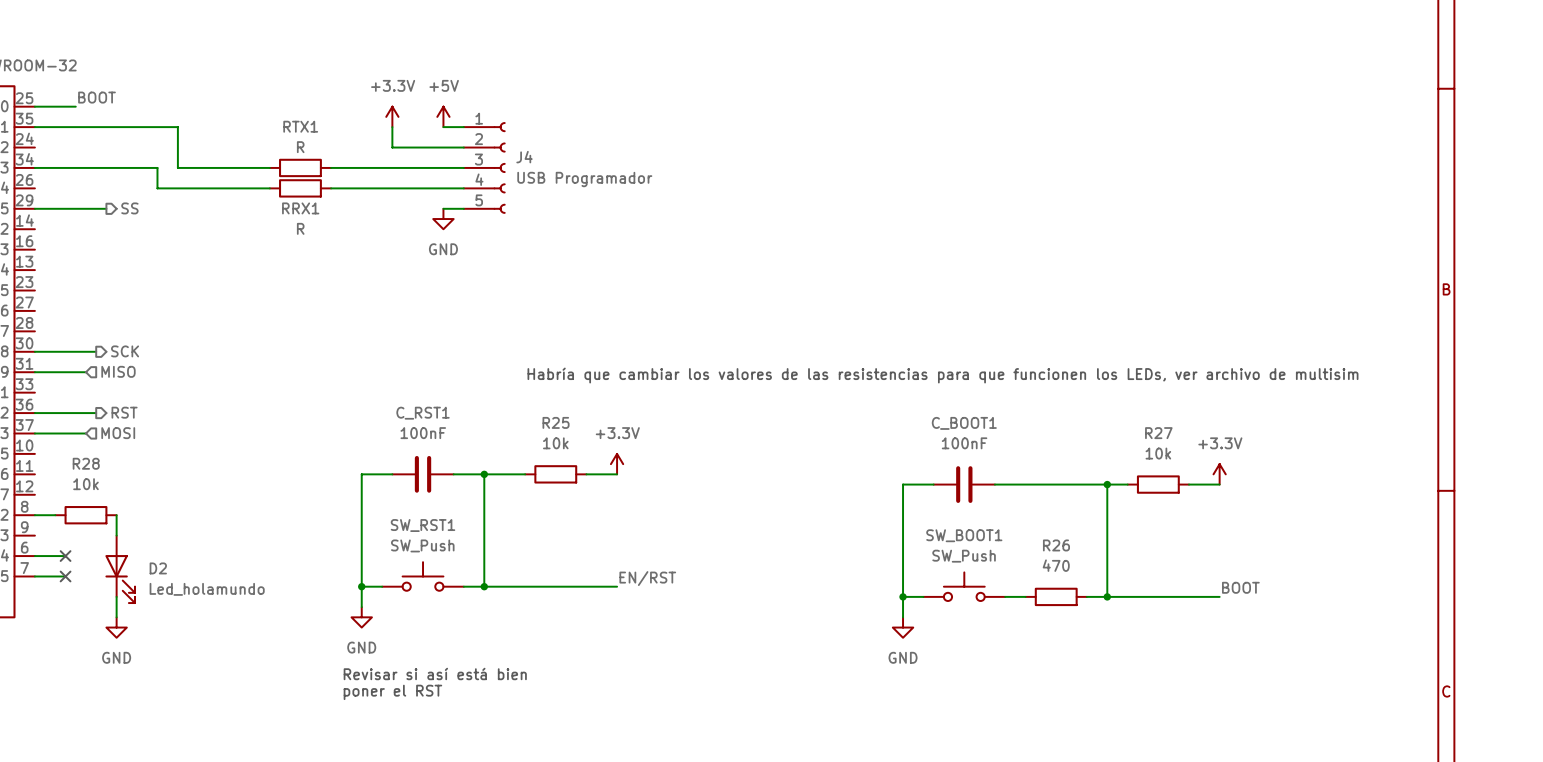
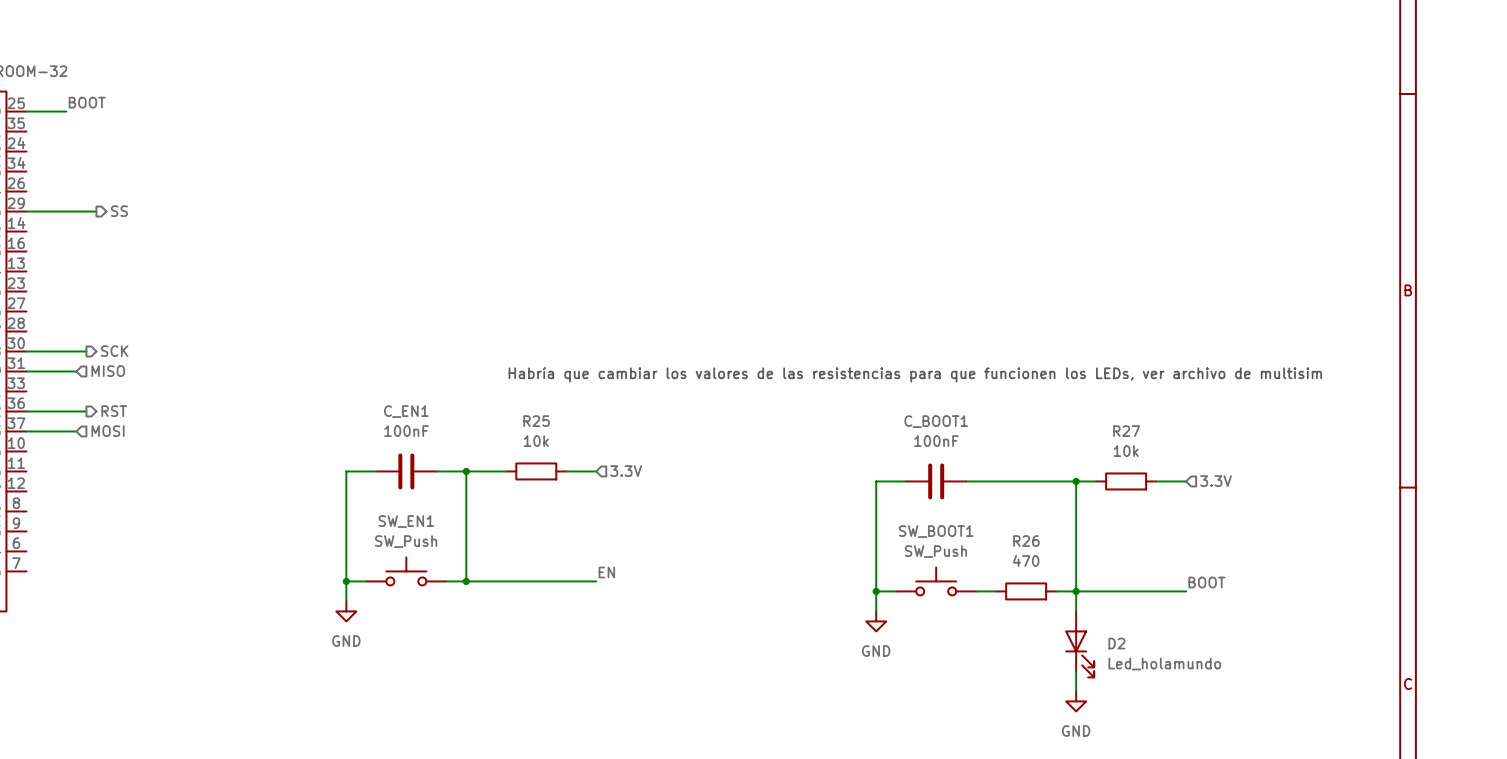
power symbol: +3.3V (392, 116) -> none
power symbol: +5V (443, 116) -> none
wire: (34, 127) (177, 127) (177, 167) (269, 167) -> none
wire: (392, 127) (392, 147) (463, 147) -> none
wire: (443, 127) (463, 127) -> none
wire: (34, 167) (157, 167) (157, 188) (269, 188) -> none
RTX1: R (300, 167) -> none
wire: (331, 167) (463, 167) -> none
J4: USB Programador (484, 167) -> none
RRX1: R (300, 188) -> none
wire: (331, 188) (463, 188) -> none
wire: (443, 208) (463, 208) -> none
power symbol: GND (443, 219) -> none
C_RST1 name: C_RST1 (423, 413) -> C_EN1 (406, 411)
power symbol: +3.3V (617, 464) -> none
hierarchical label: none -> 3.3V (626, 471)
power symbol: +3.3V (1219, 474) -> none
hierarchical label: none -> 3.3V (1216, 481)
wire: (34, 515) (55, 515) -> none
R28: 10k (85, 515) -> none
wire: (116, 515) (116, 535) -> none
SW_RST1 name: SW_RST1 (423, 525) -> SW_EN1 (406, 521)
wire: (34, 556) (65, 556) -> none
no-connect mark: (65, 556) -> none
D2 position: (120, 569) -> (1079, 644)
wire: (34, 576) (65, 576) -> none
no-connect mark: (65, 576) -> none
label: EN/RST (647, 578) -> EN (606, 572)
wire: (116, 596) (116, 617) -> none
wire: none -> (1076, 591) (1076, 611)
power symbol: GND (116, 627) -> none
text: Revisar si así está bien (435, 673) -> none
wire: none -> (1076, 671) (1076, 691)
text: poner el RST (392, 692) -> none
power symbol: none -> GND (1076, 701)

